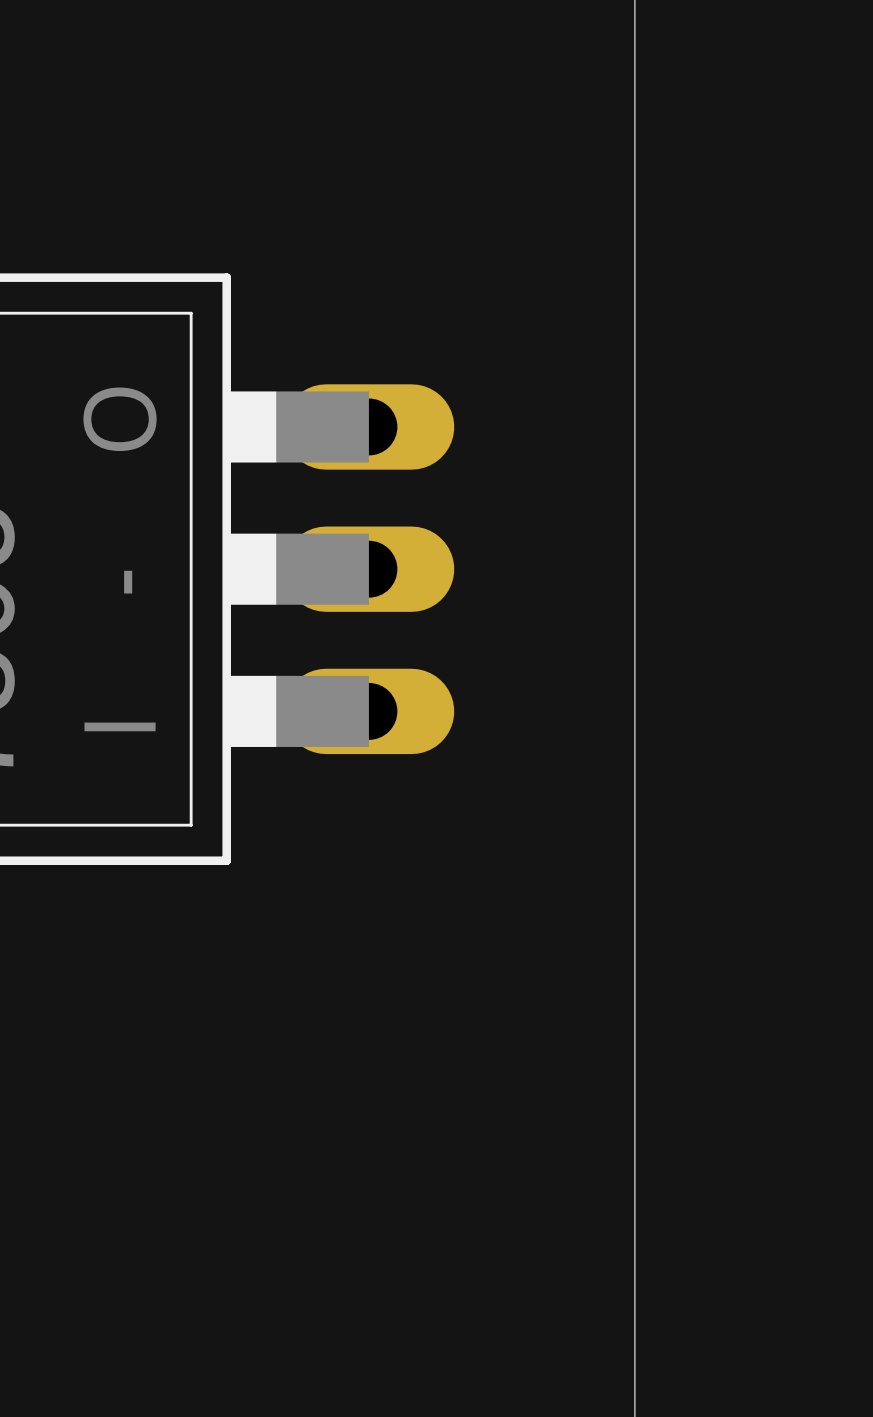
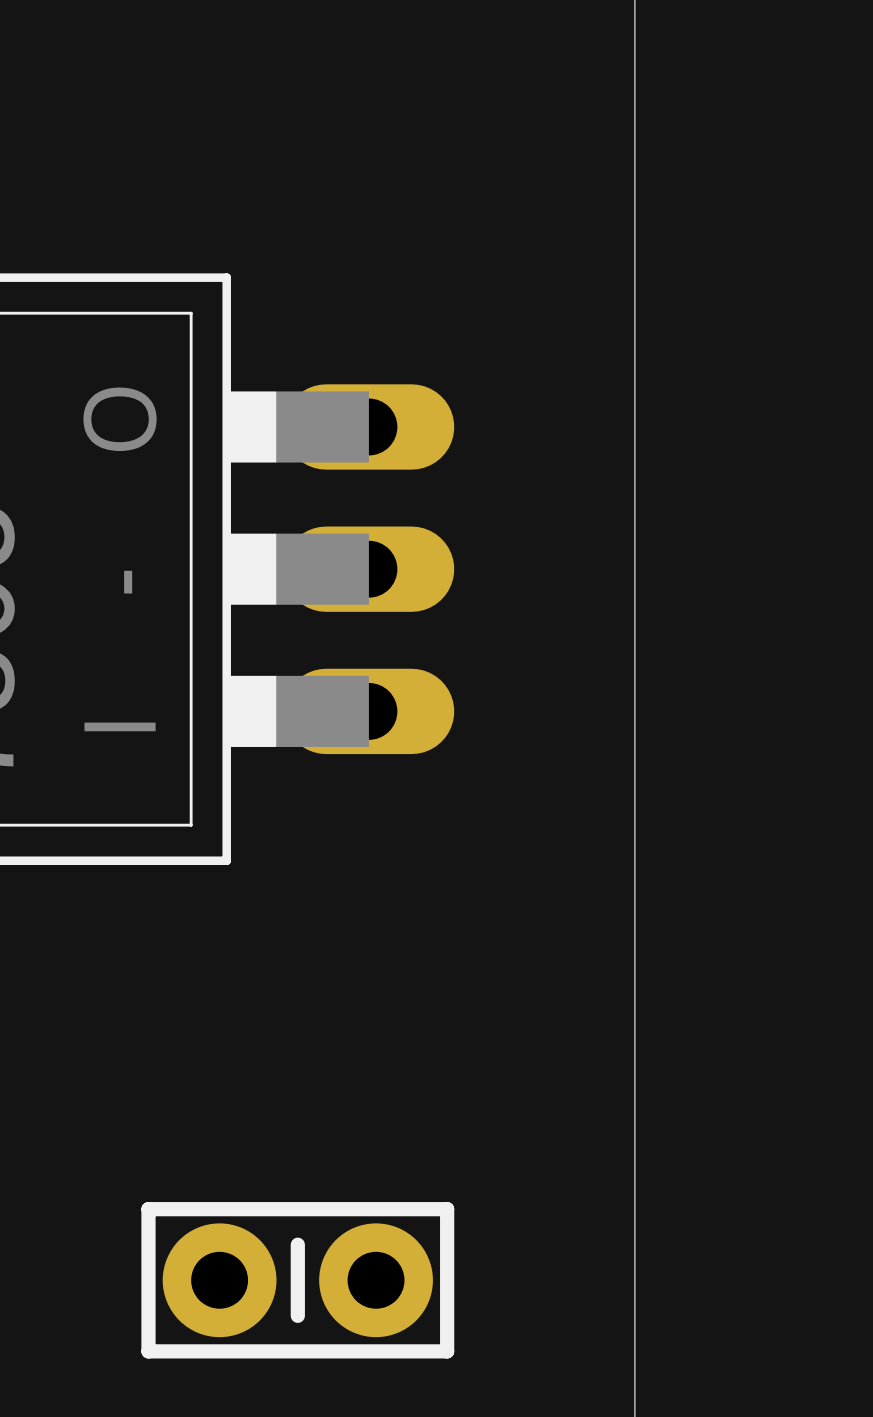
part: none -> (297, 1280)

